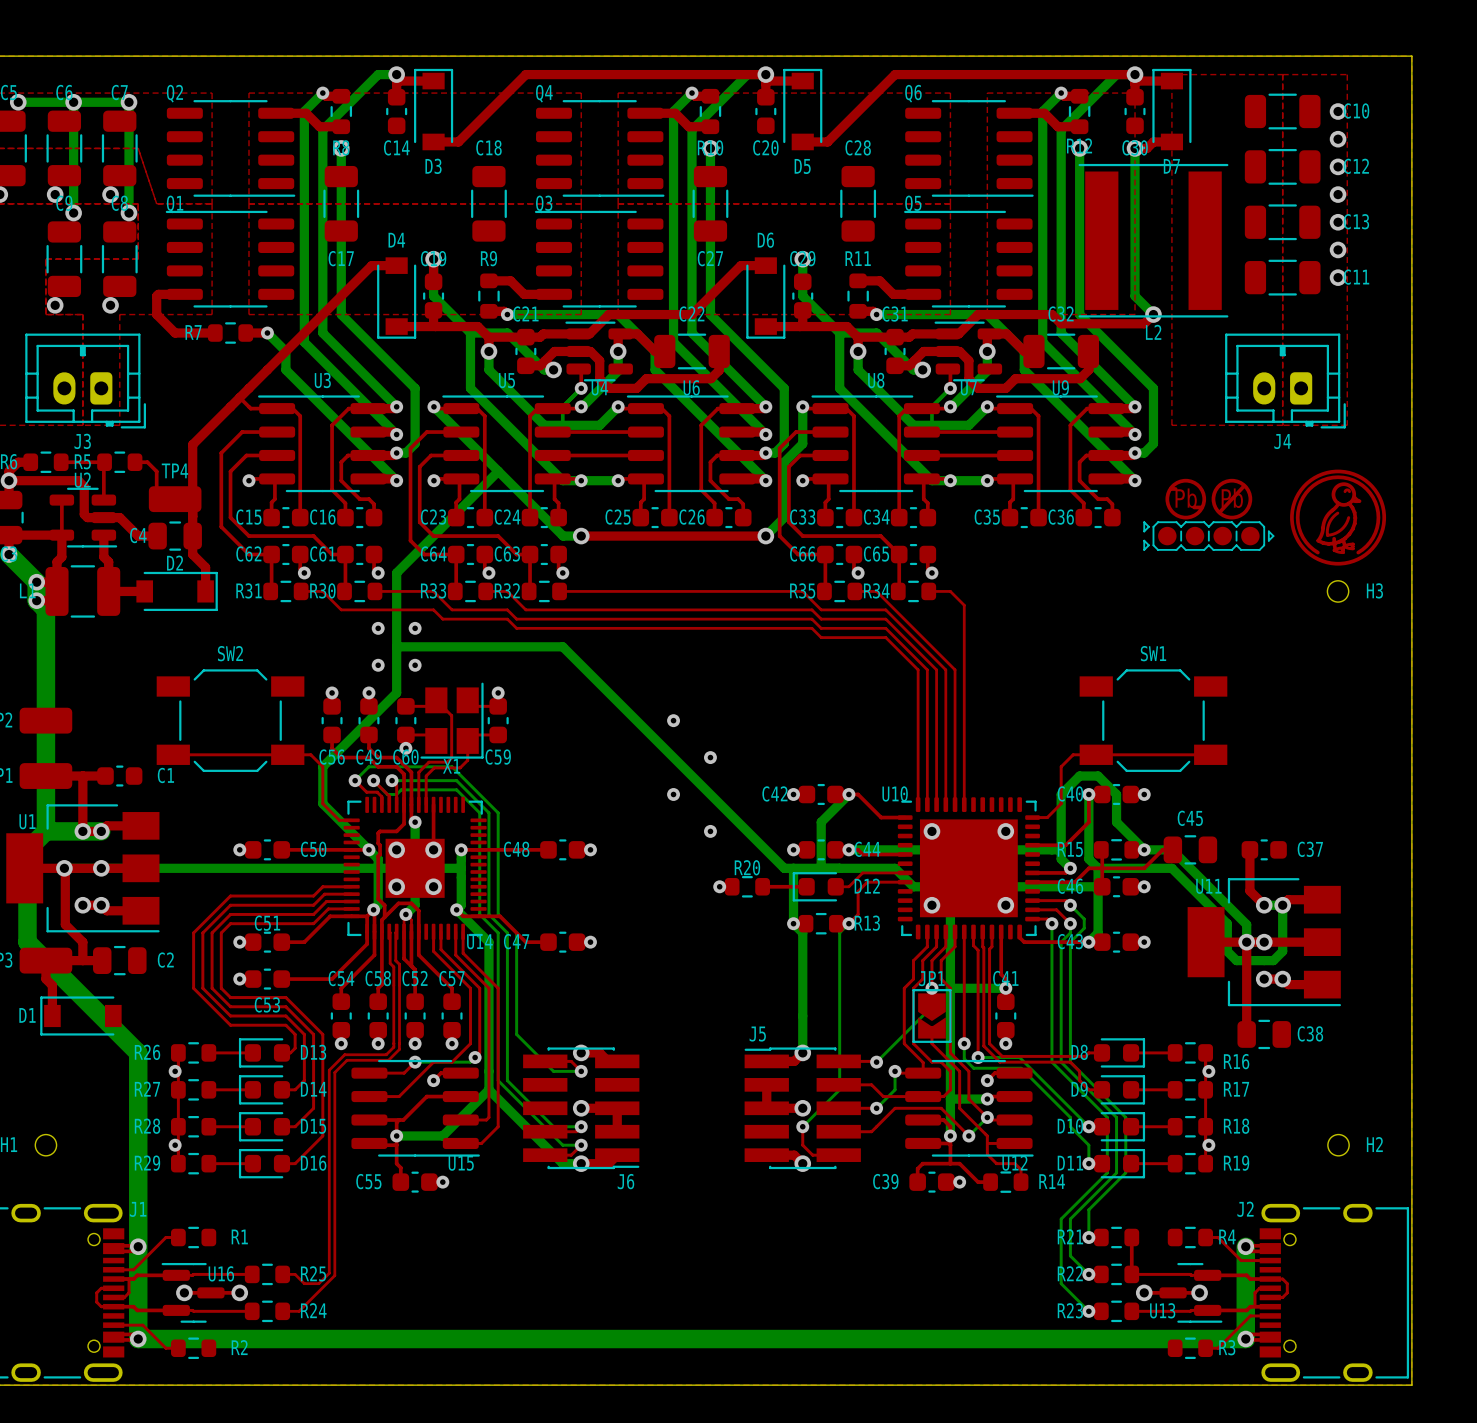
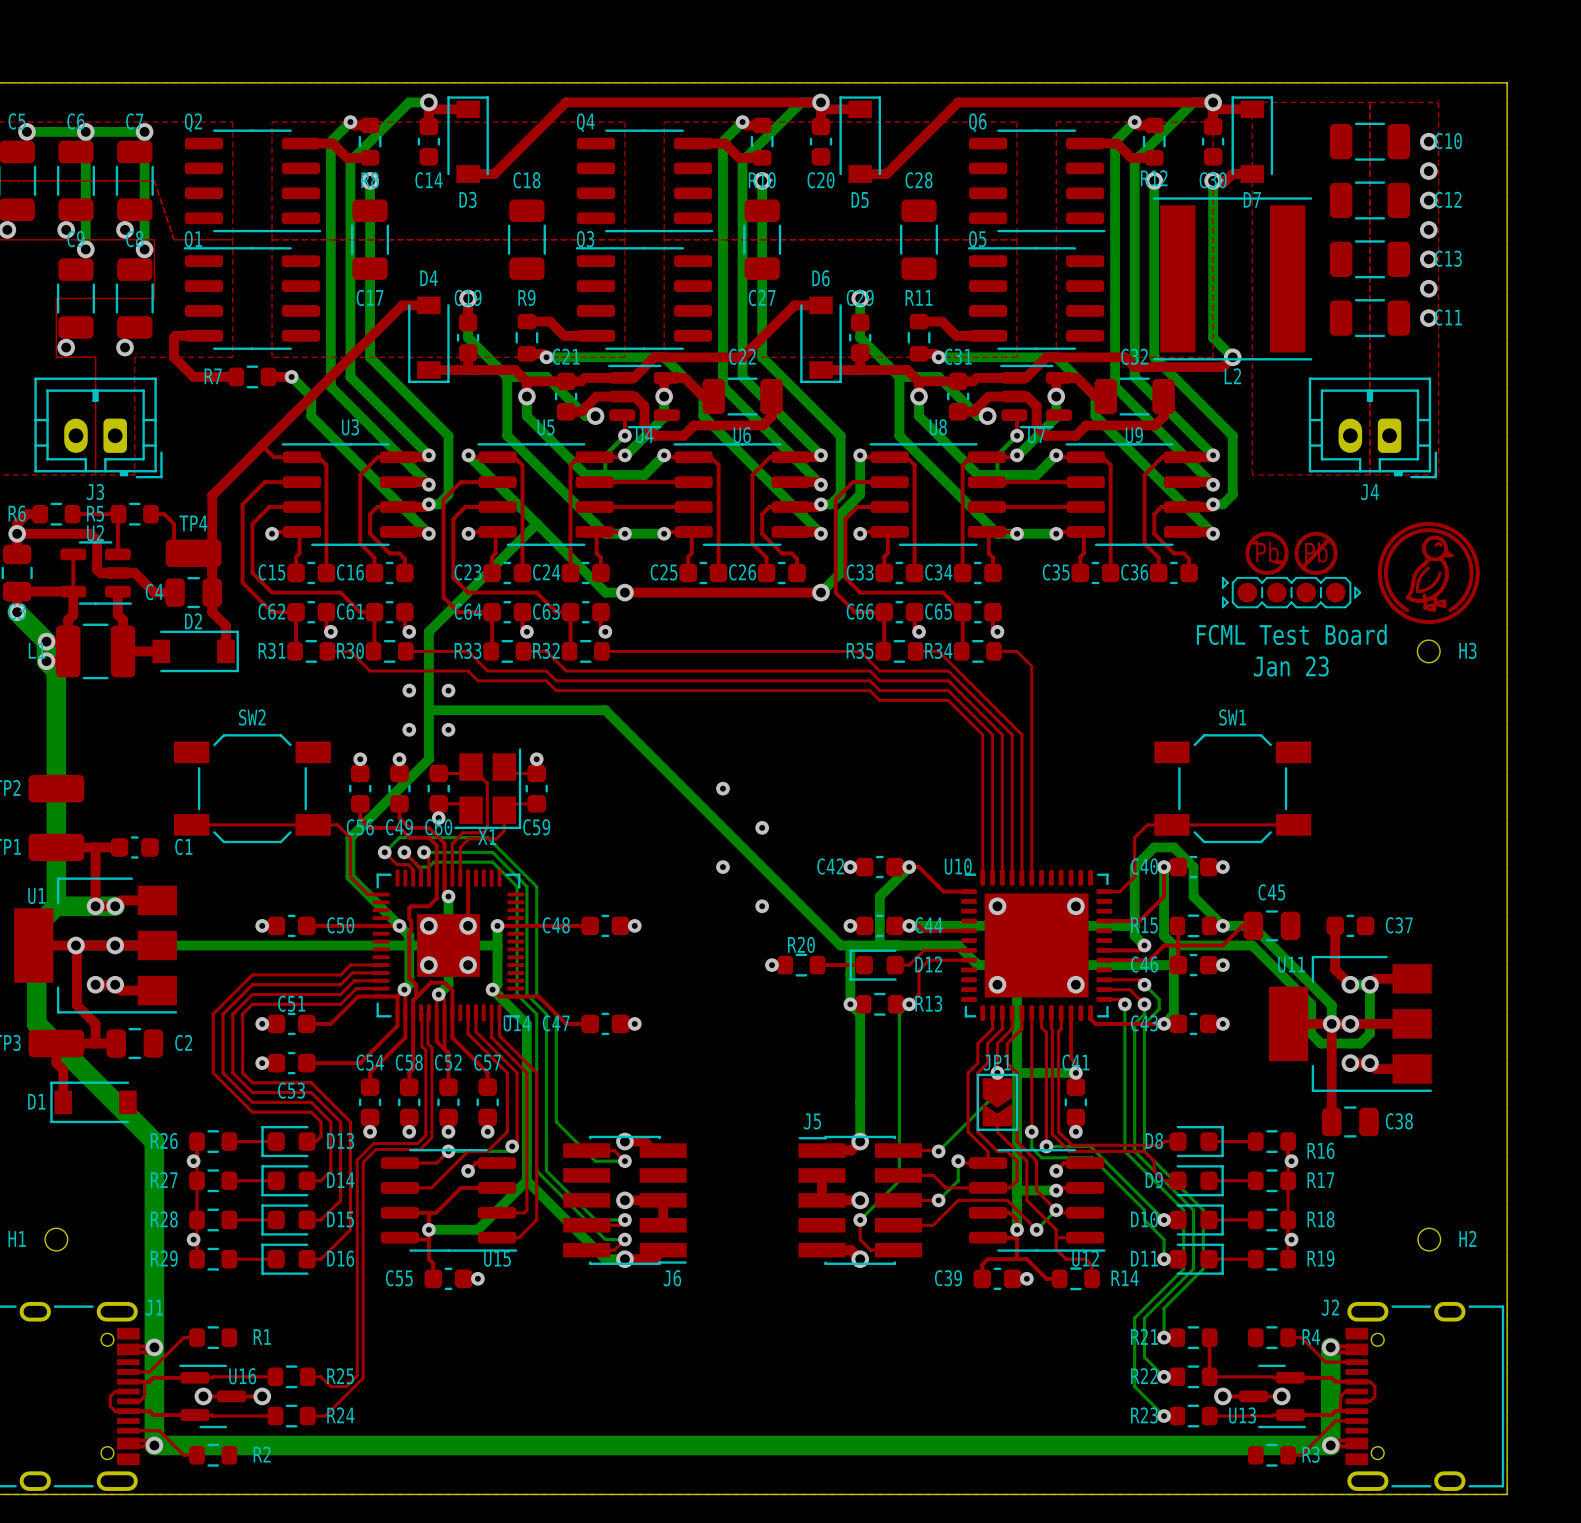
text: none -> FCML Test Board (1291, 634)
text: none -> Jan 23 (1291, 666)

